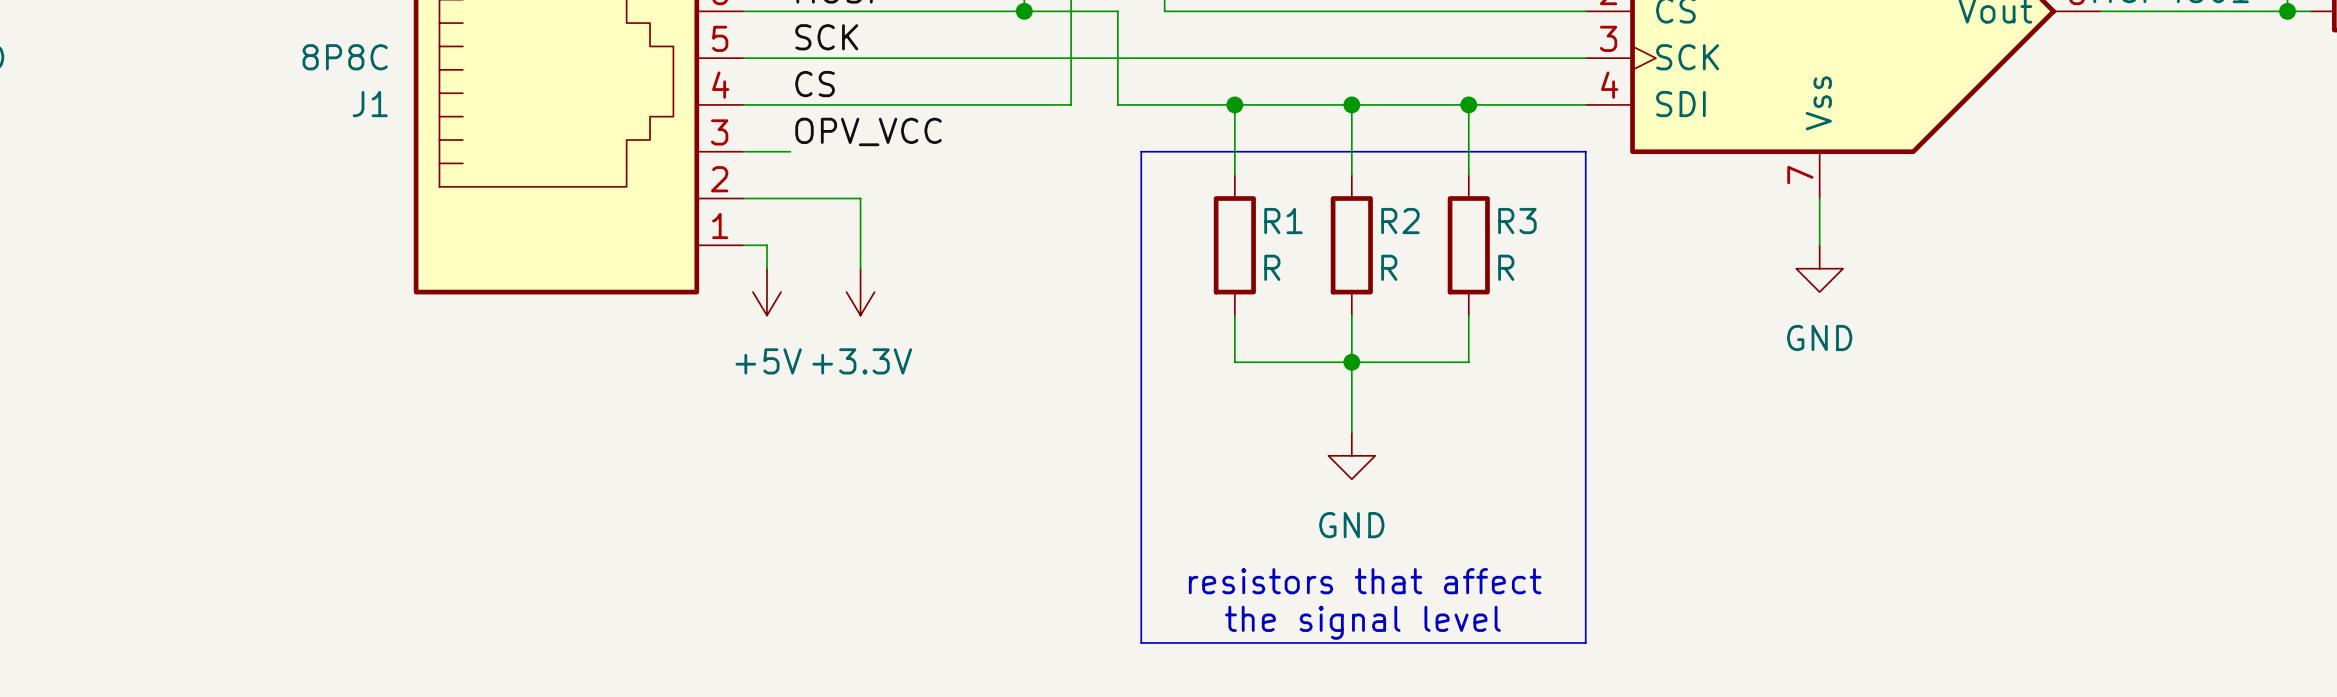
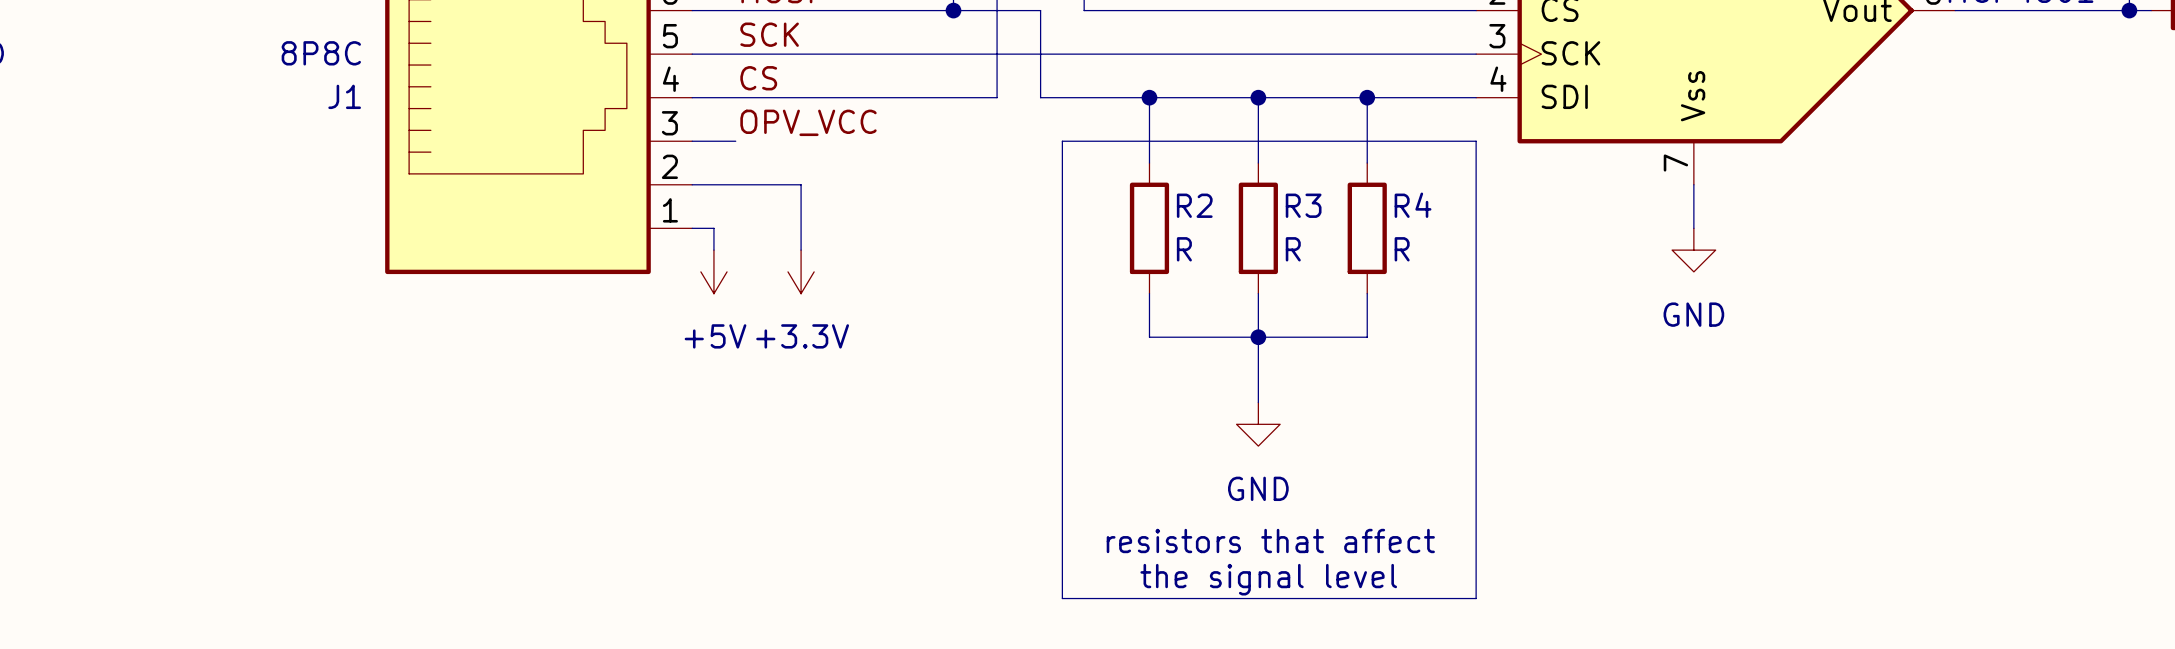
R1 name: R1 (1283, 221) -> R2 (1194, 205)
R2 name: R2 (1400, 221) -> R3 (1303, 205)
R3 name: R3 (1517, 221) -> R4 (1413, 205)

